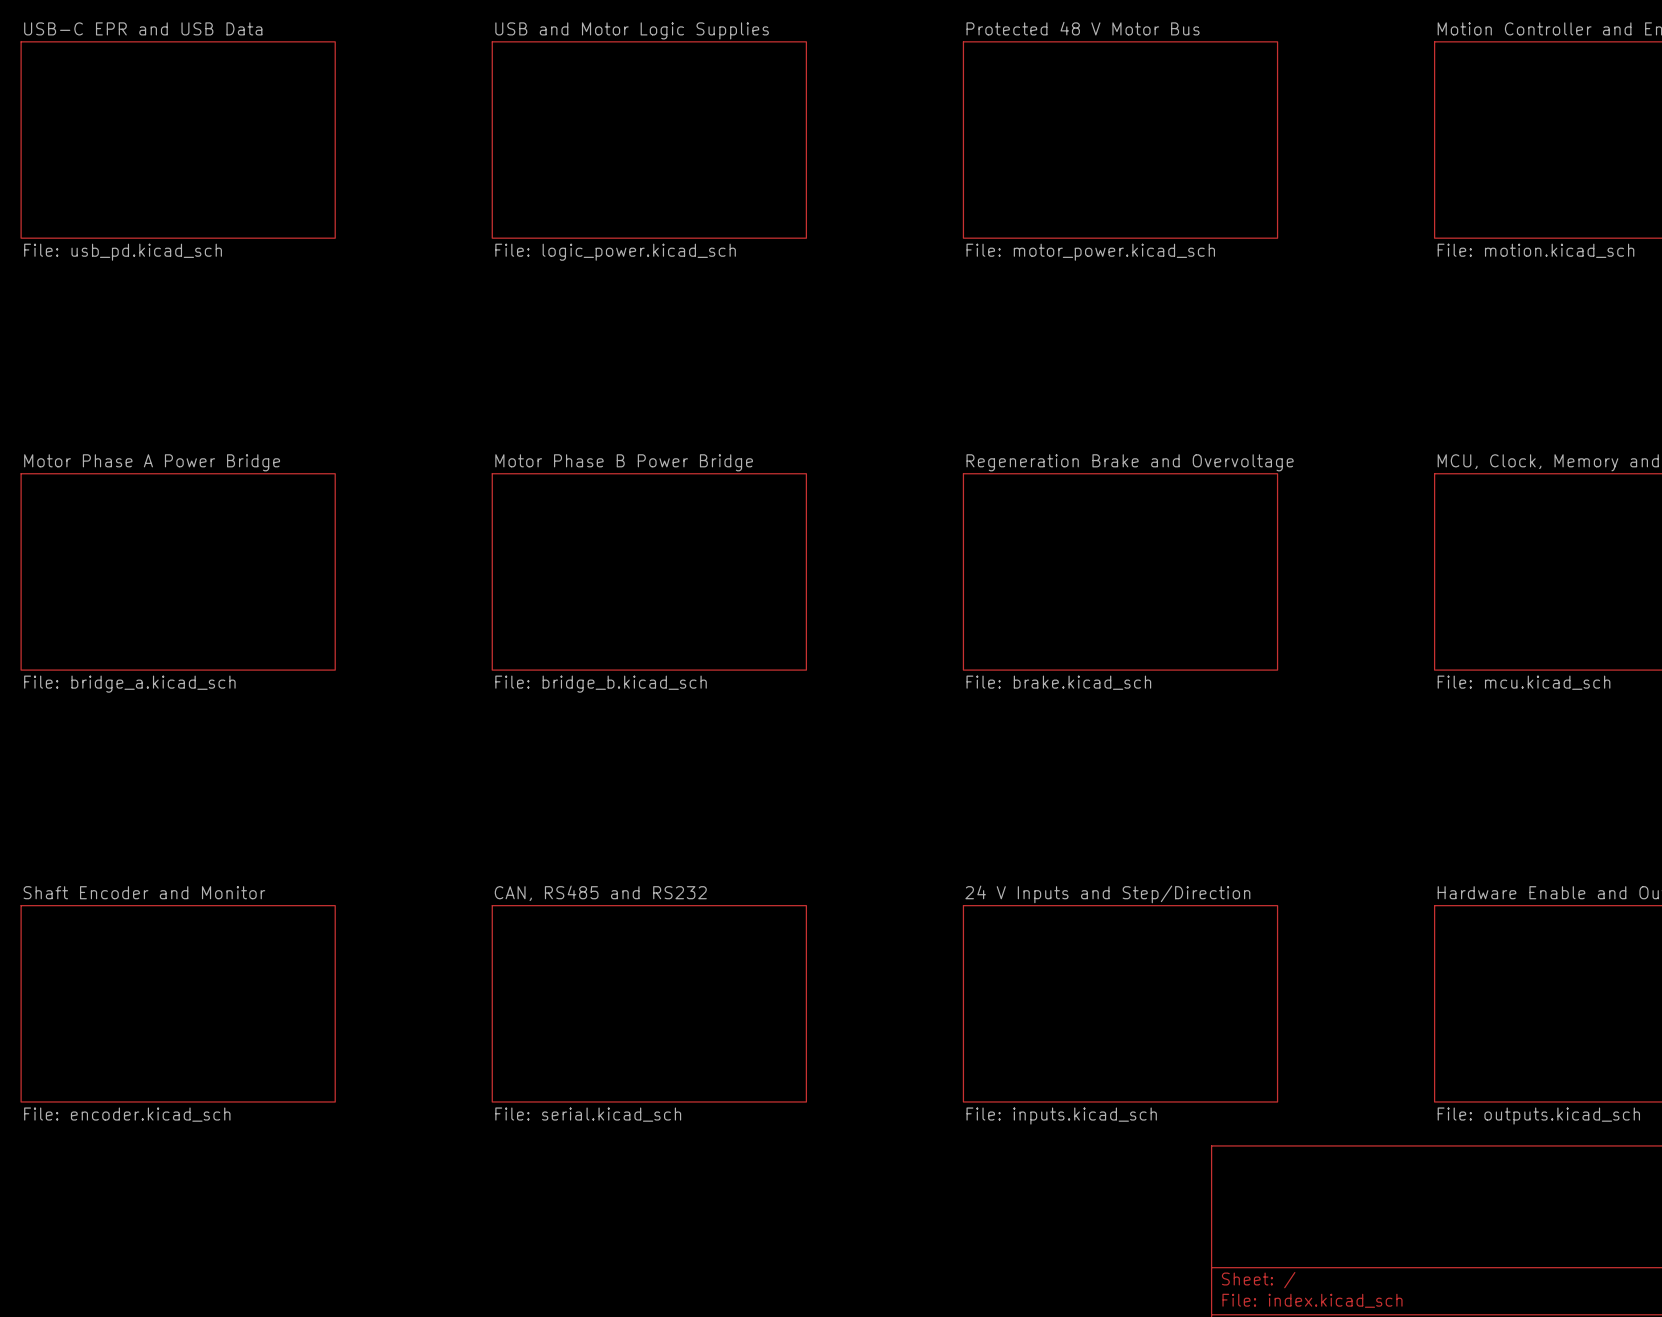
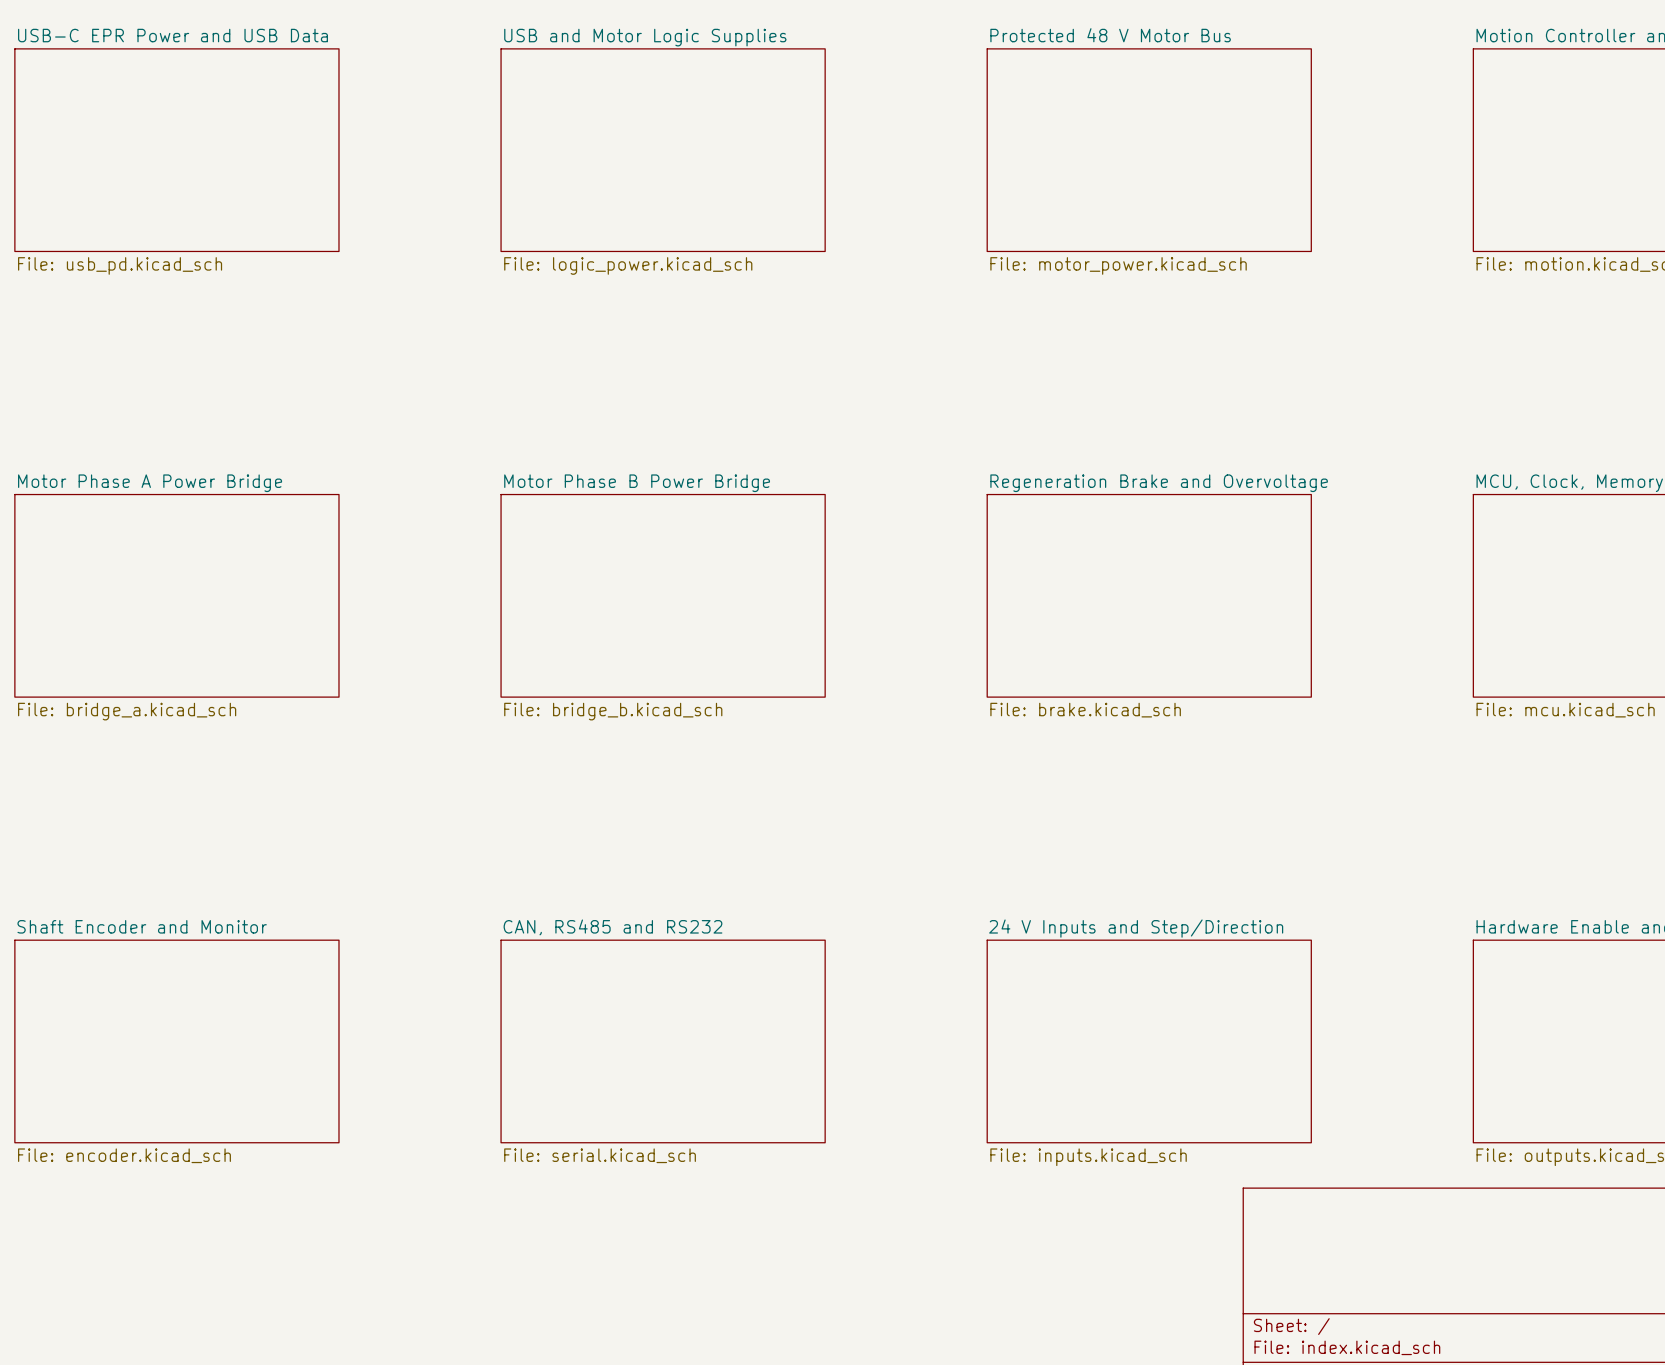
sheet USB-C EPR and USB Data name: USB-C EPR and USB Data (143, 28) -> USB-C EPR Power and USB Data (172, 35)

